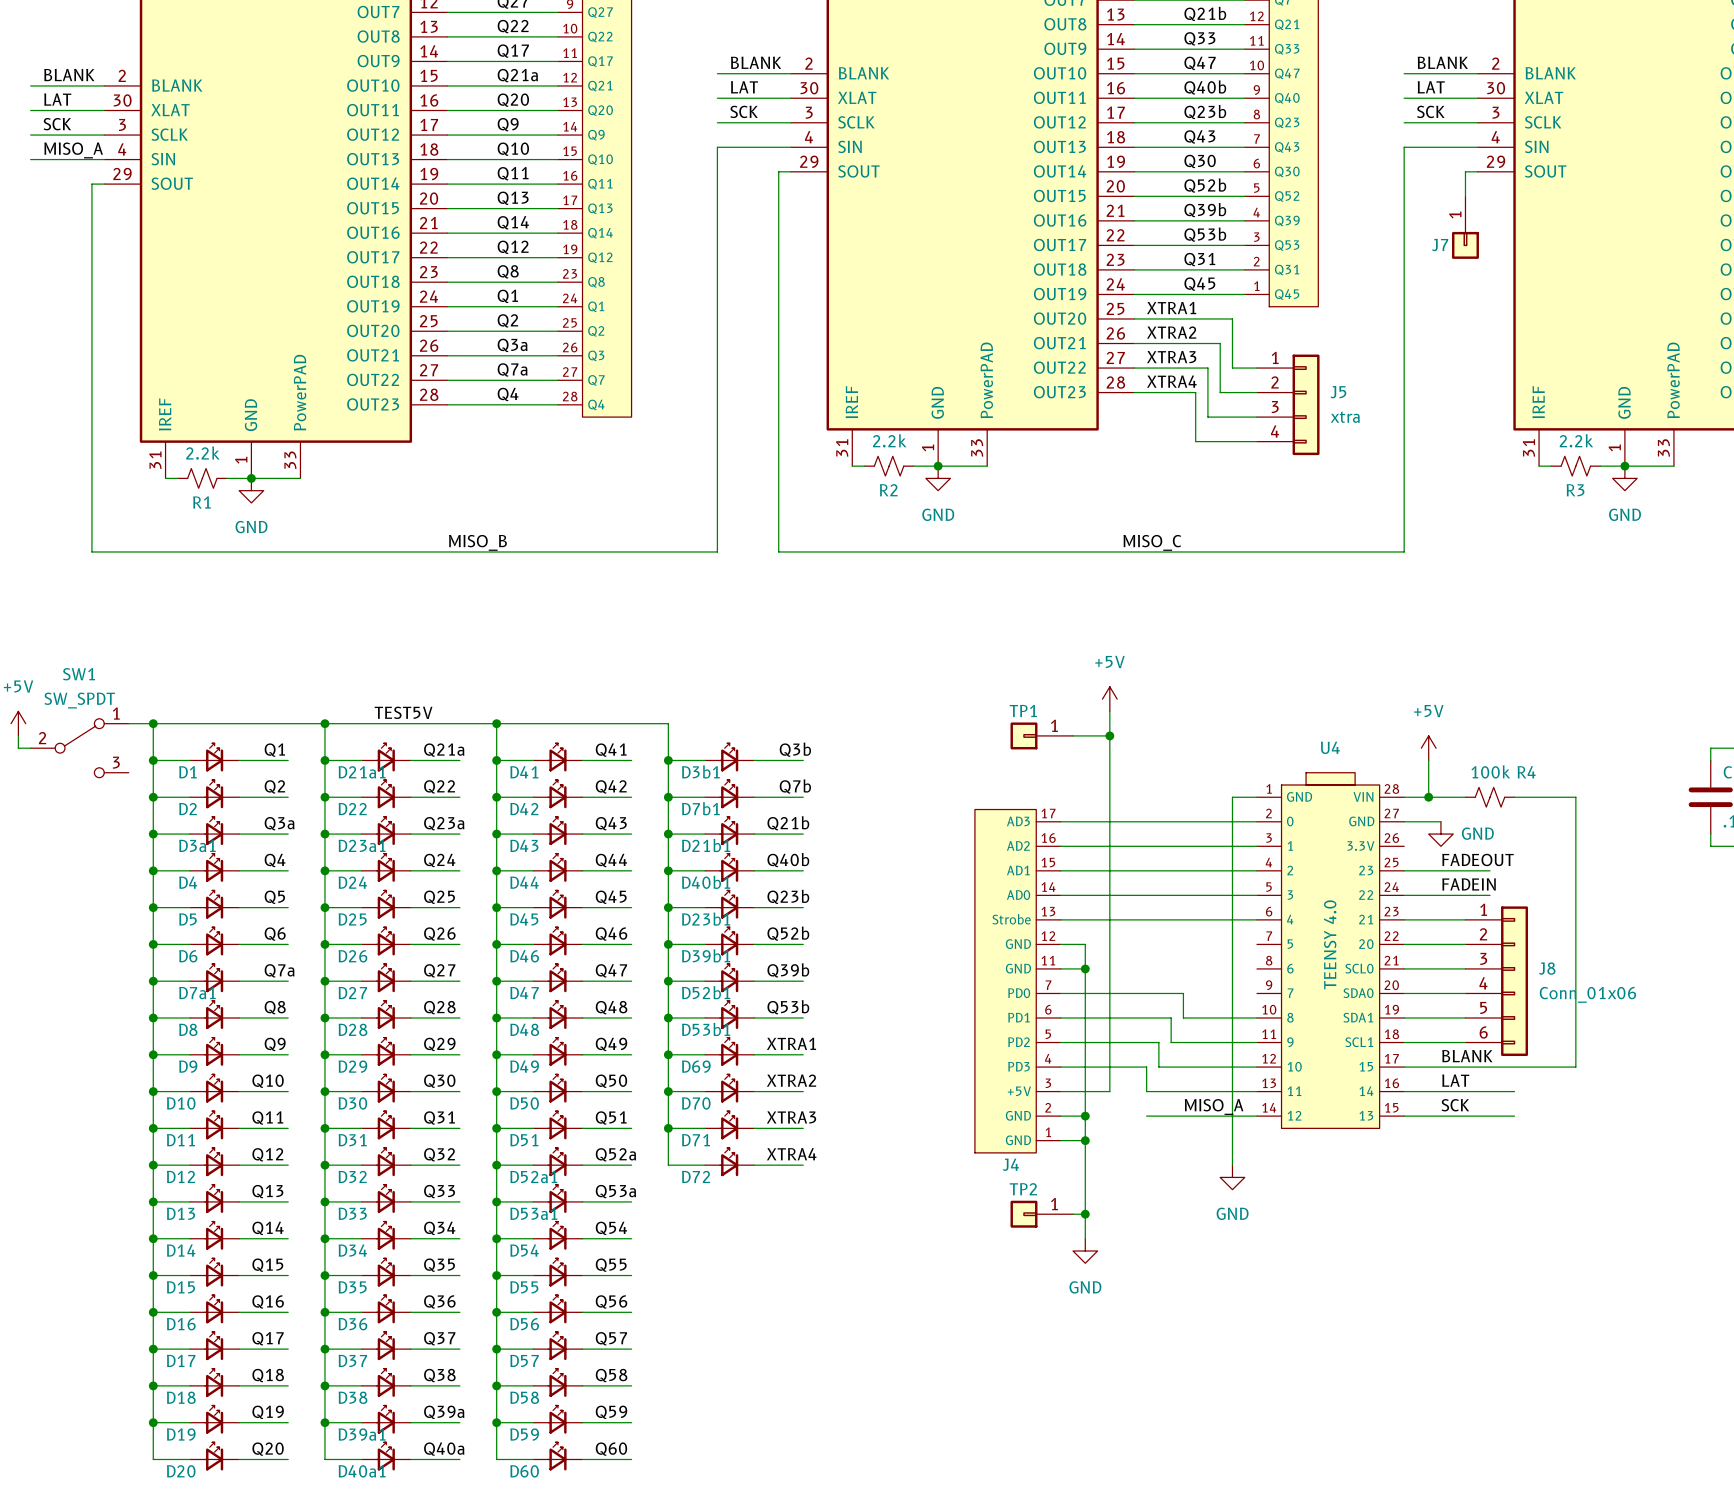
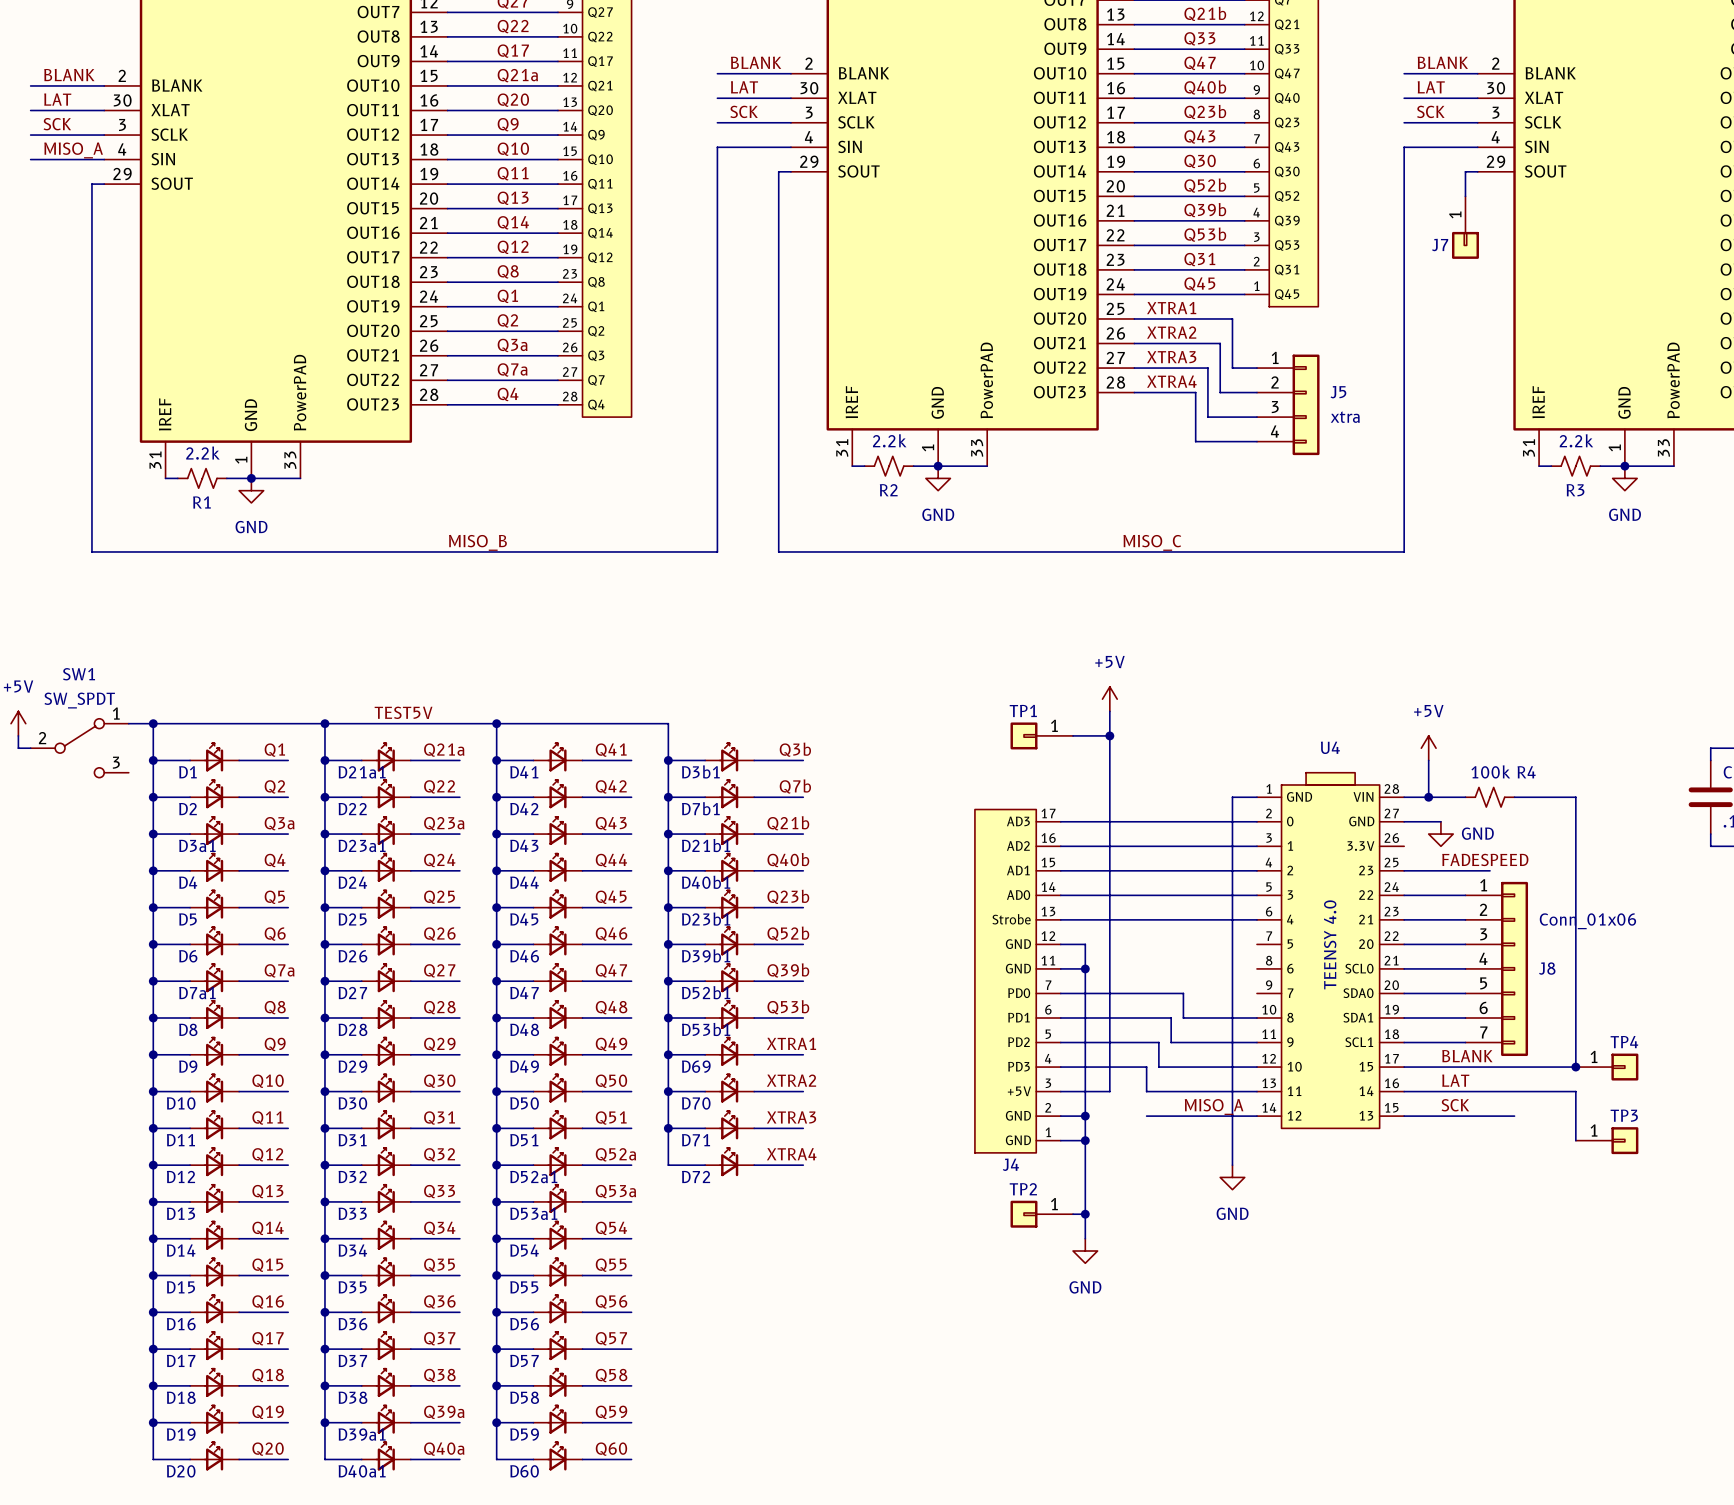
label: FADEOUT (1477, 859) -> FADESPEED (1485, 859)
label: FADEIN (1469, 884) -> none
J8 symbol: [1465, 906, 1529, 1057] -> [1465, 881, 1529, 1057]
J8 value position: Conn_01x06 (1587, 994) -> Conn_01x06 (1587, 921)
junction: none -> (1575, 1067)
TP4: none -> (1607, 1067)
wire: none -> (1514, 1091) (1575, 1091) (1575, 1140)
TP3: none -> (1607, 1140)

